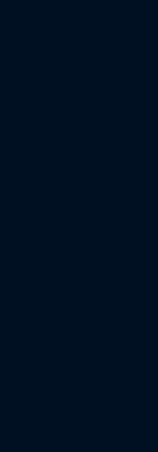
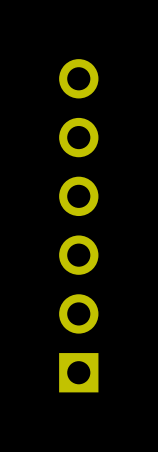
part: none -> (78, 225)

